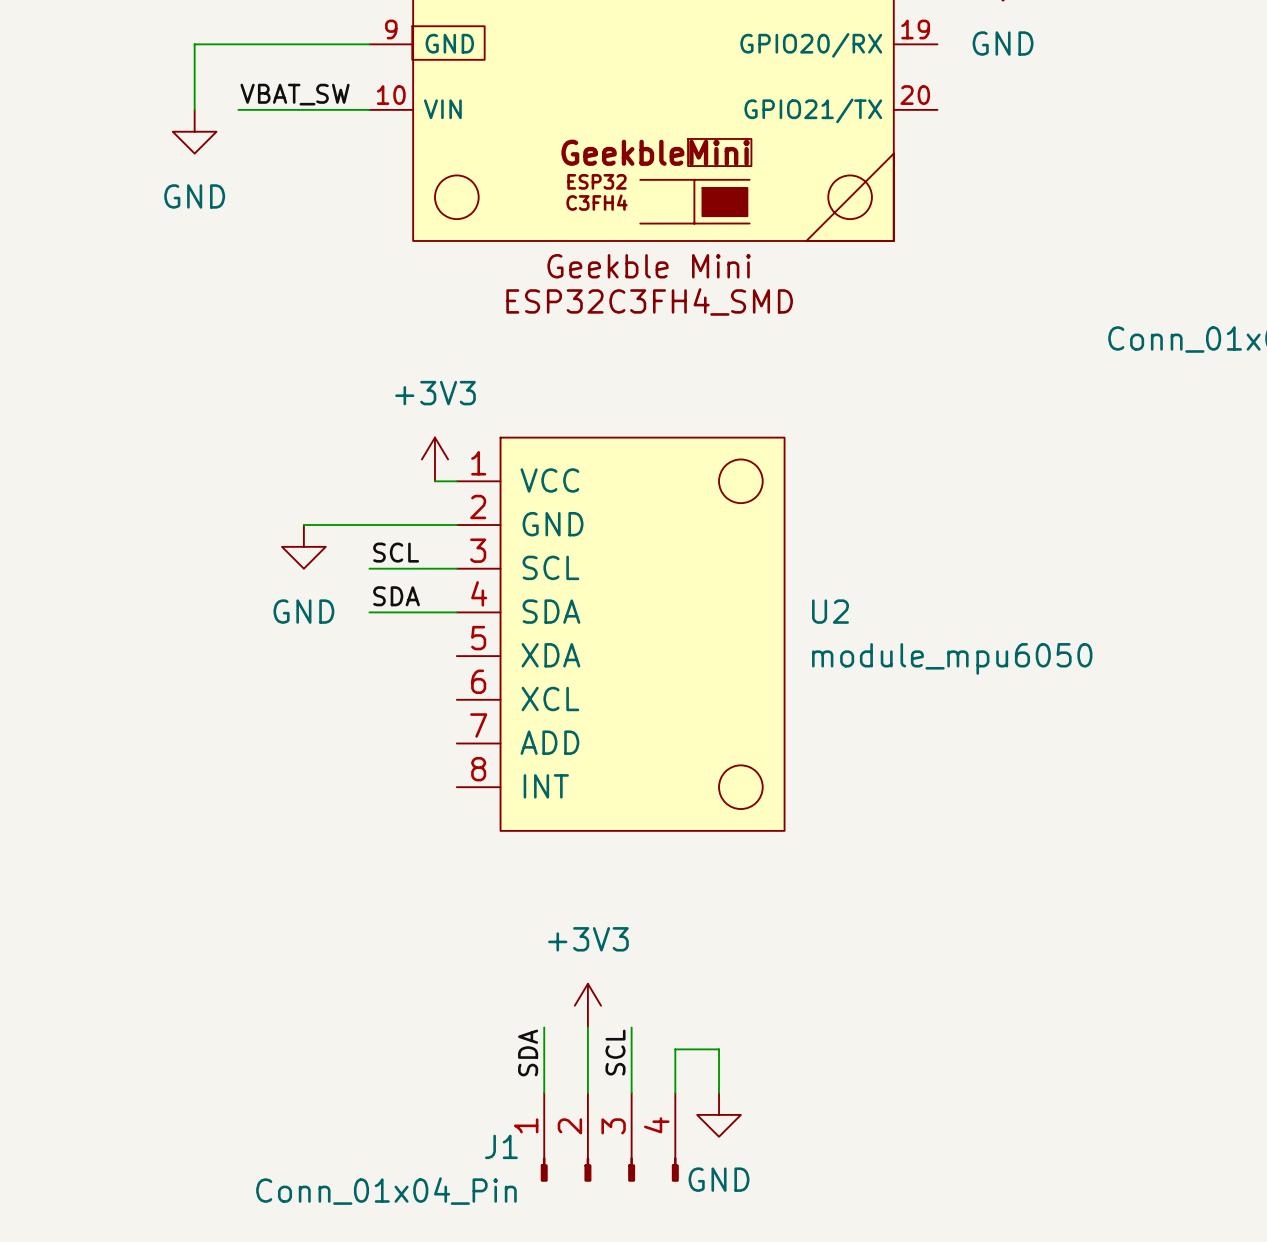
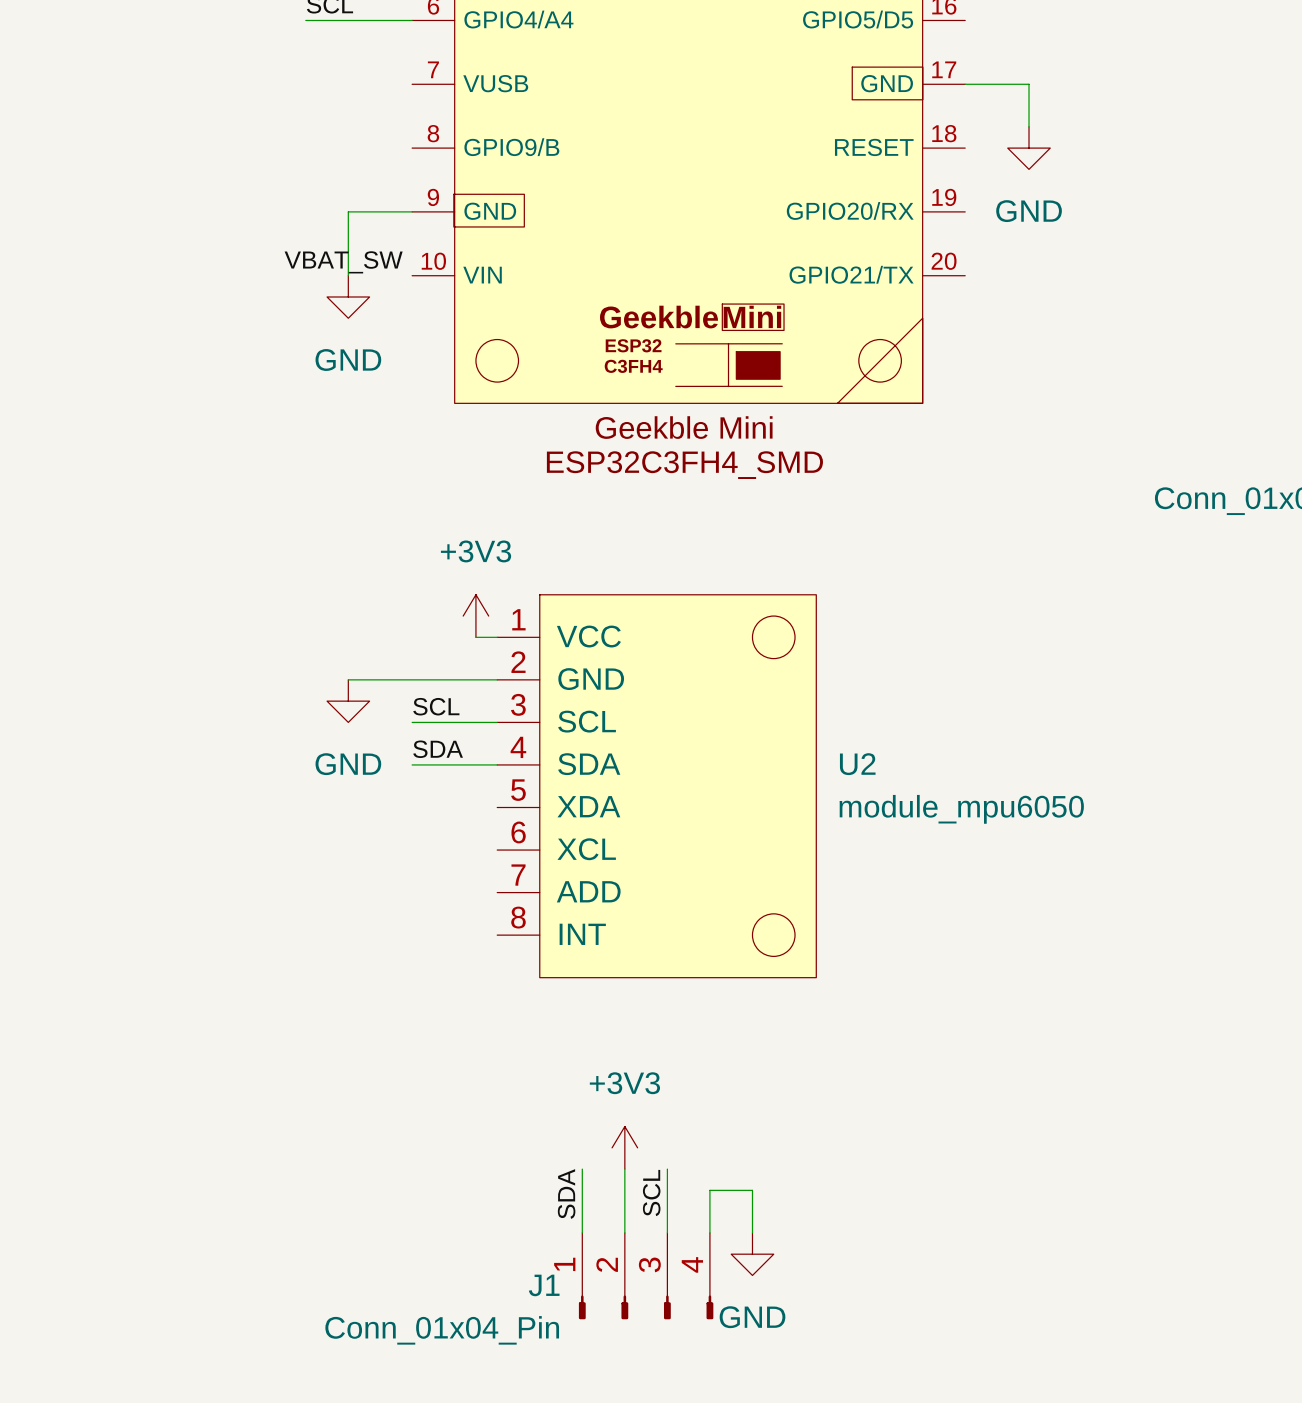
wire: (303, 44) (194, 44) (194, 109) -> (348, 211) (348, 275)
wire: (238, 109) (369, 109) -> none
power symbol position: GND (194, 131) -> GND (348, 296)

